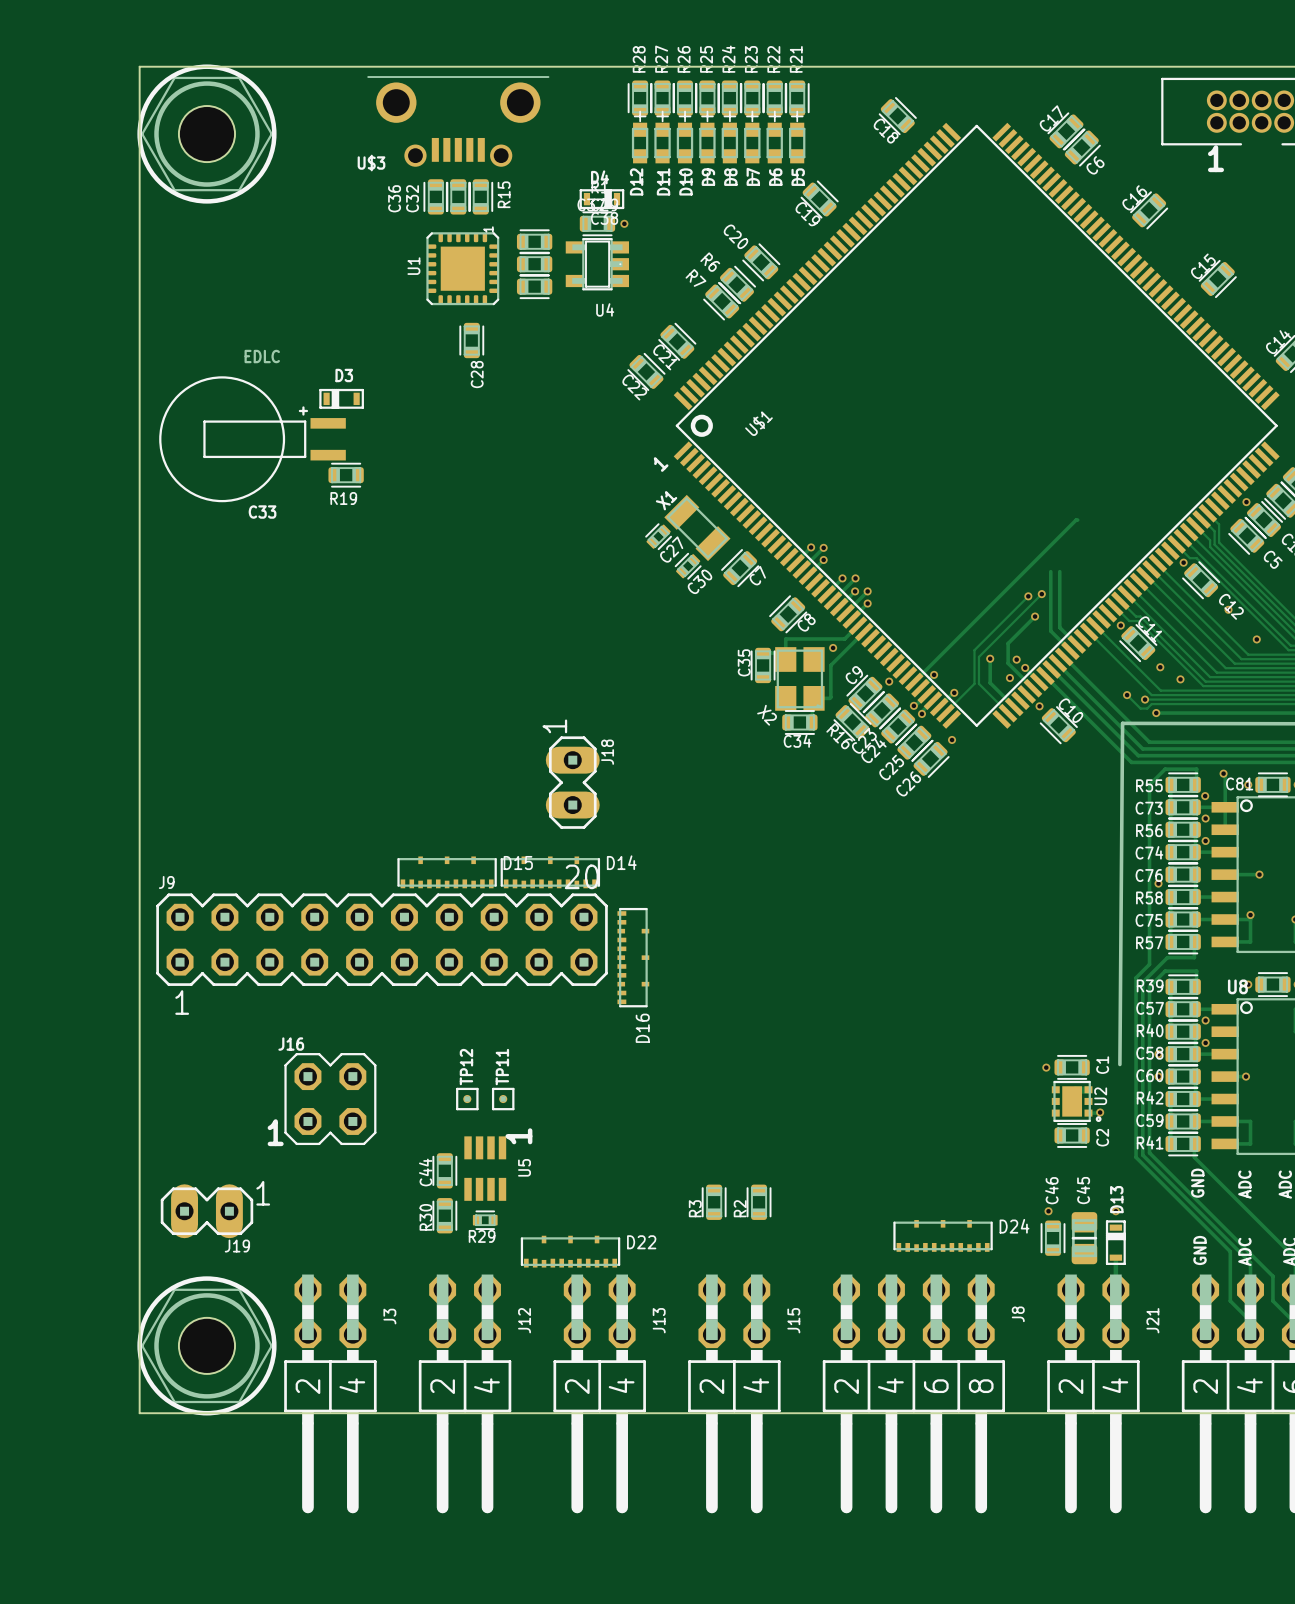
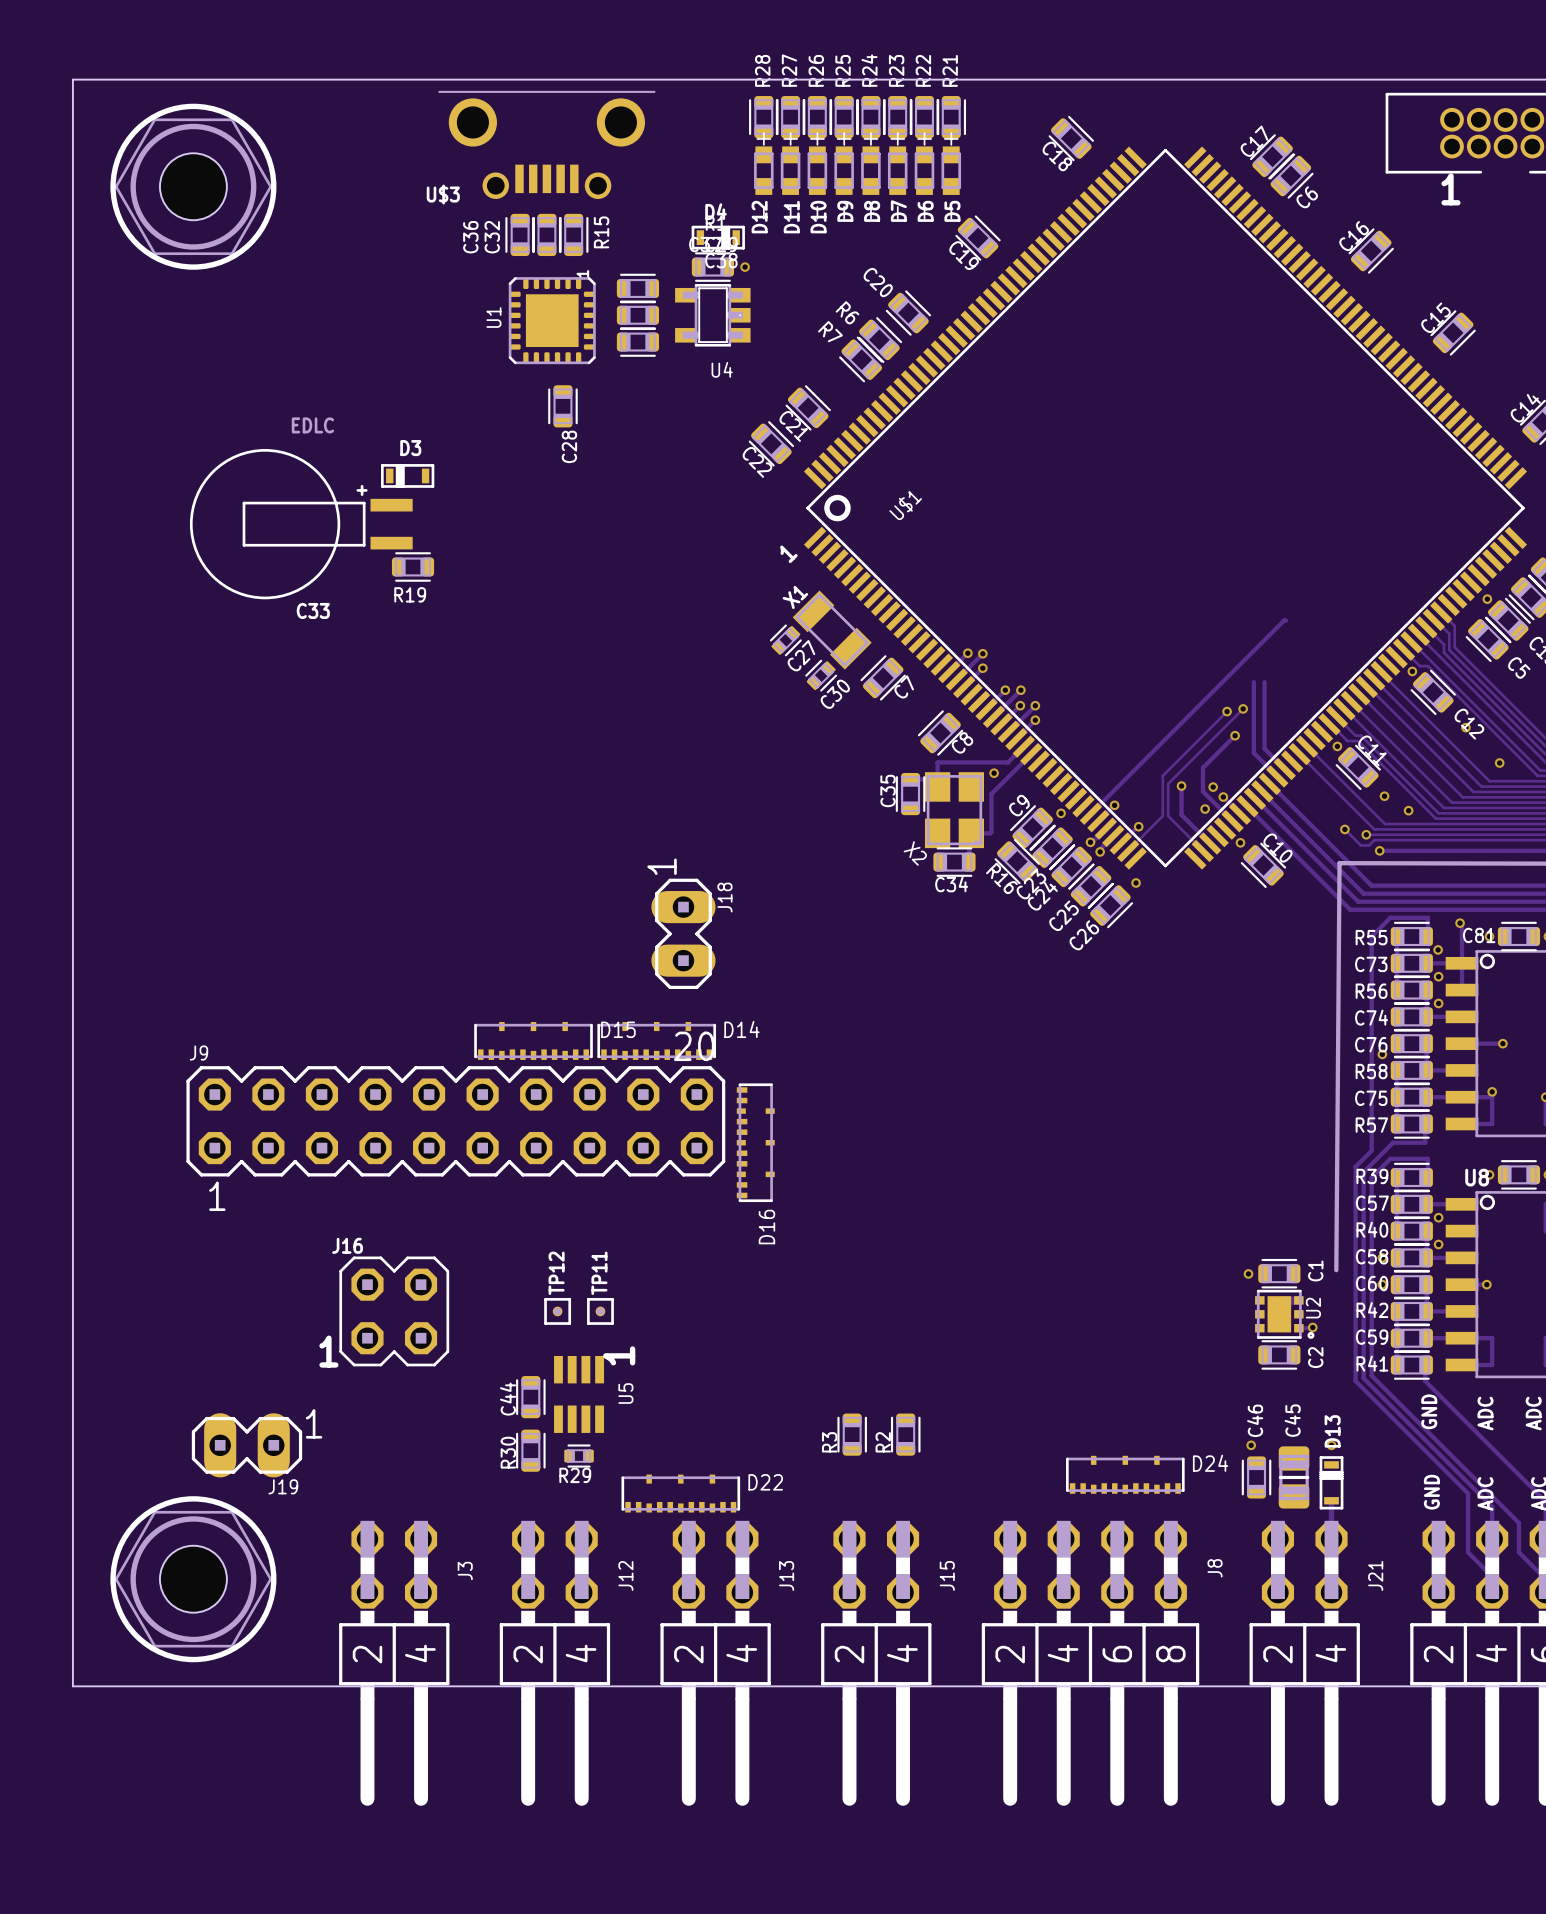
board edge: (139, 66) (139, 1413) -> (166, 79) (72, 79) (72, 1686) (166, 1686)
part position: (206, 134) -> (193, 186)
part position: (206, 1345) -> (193, 1579)

